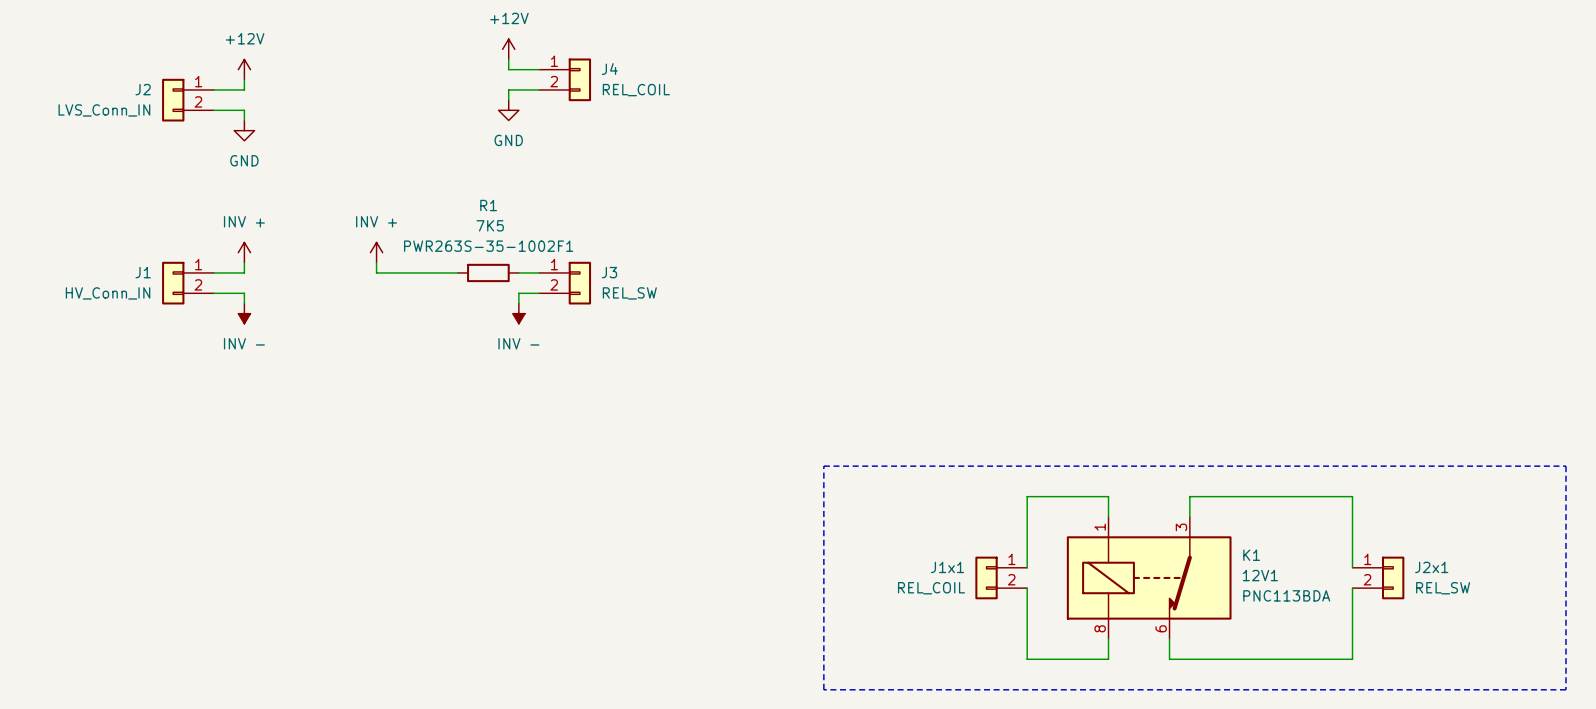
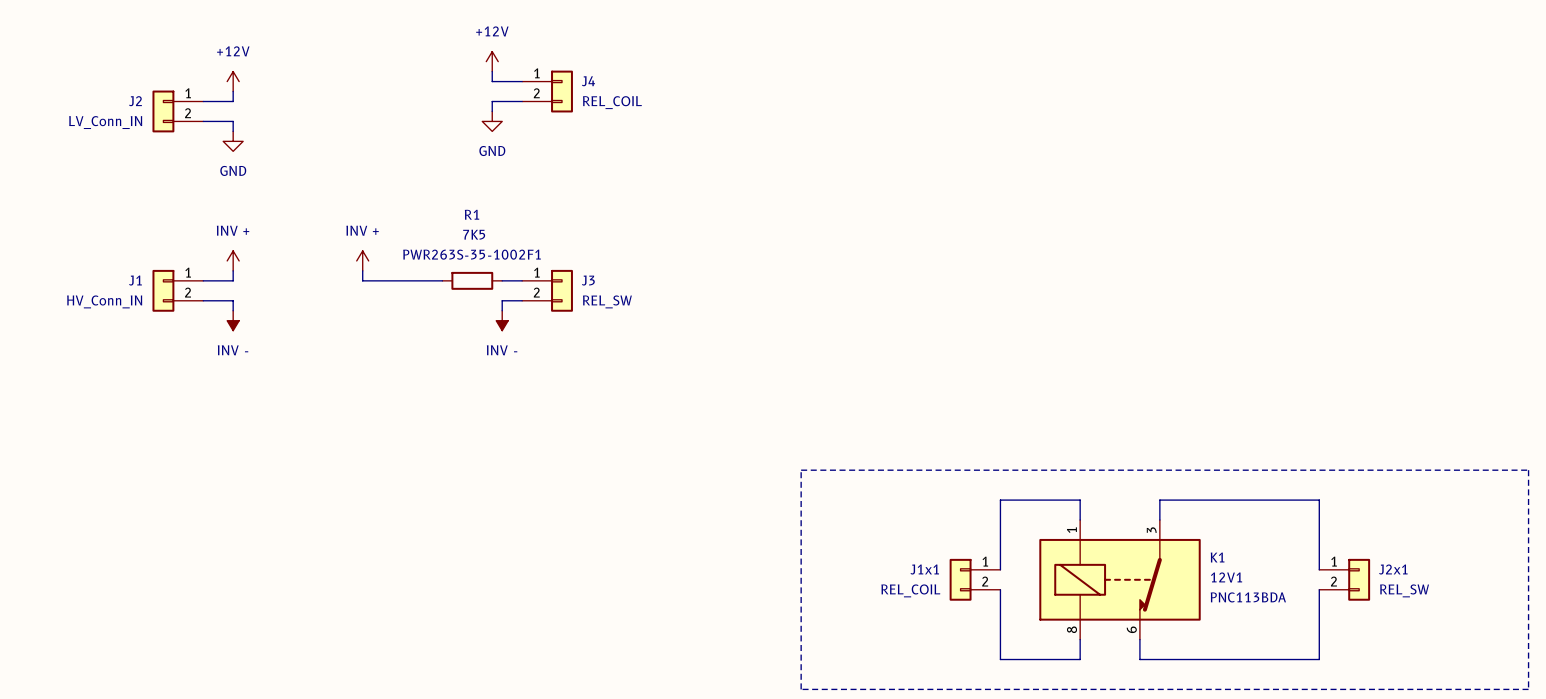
J2 value: LVS_Conn_IN (104, 110) -> LV_Conn_IN (105, 122)

